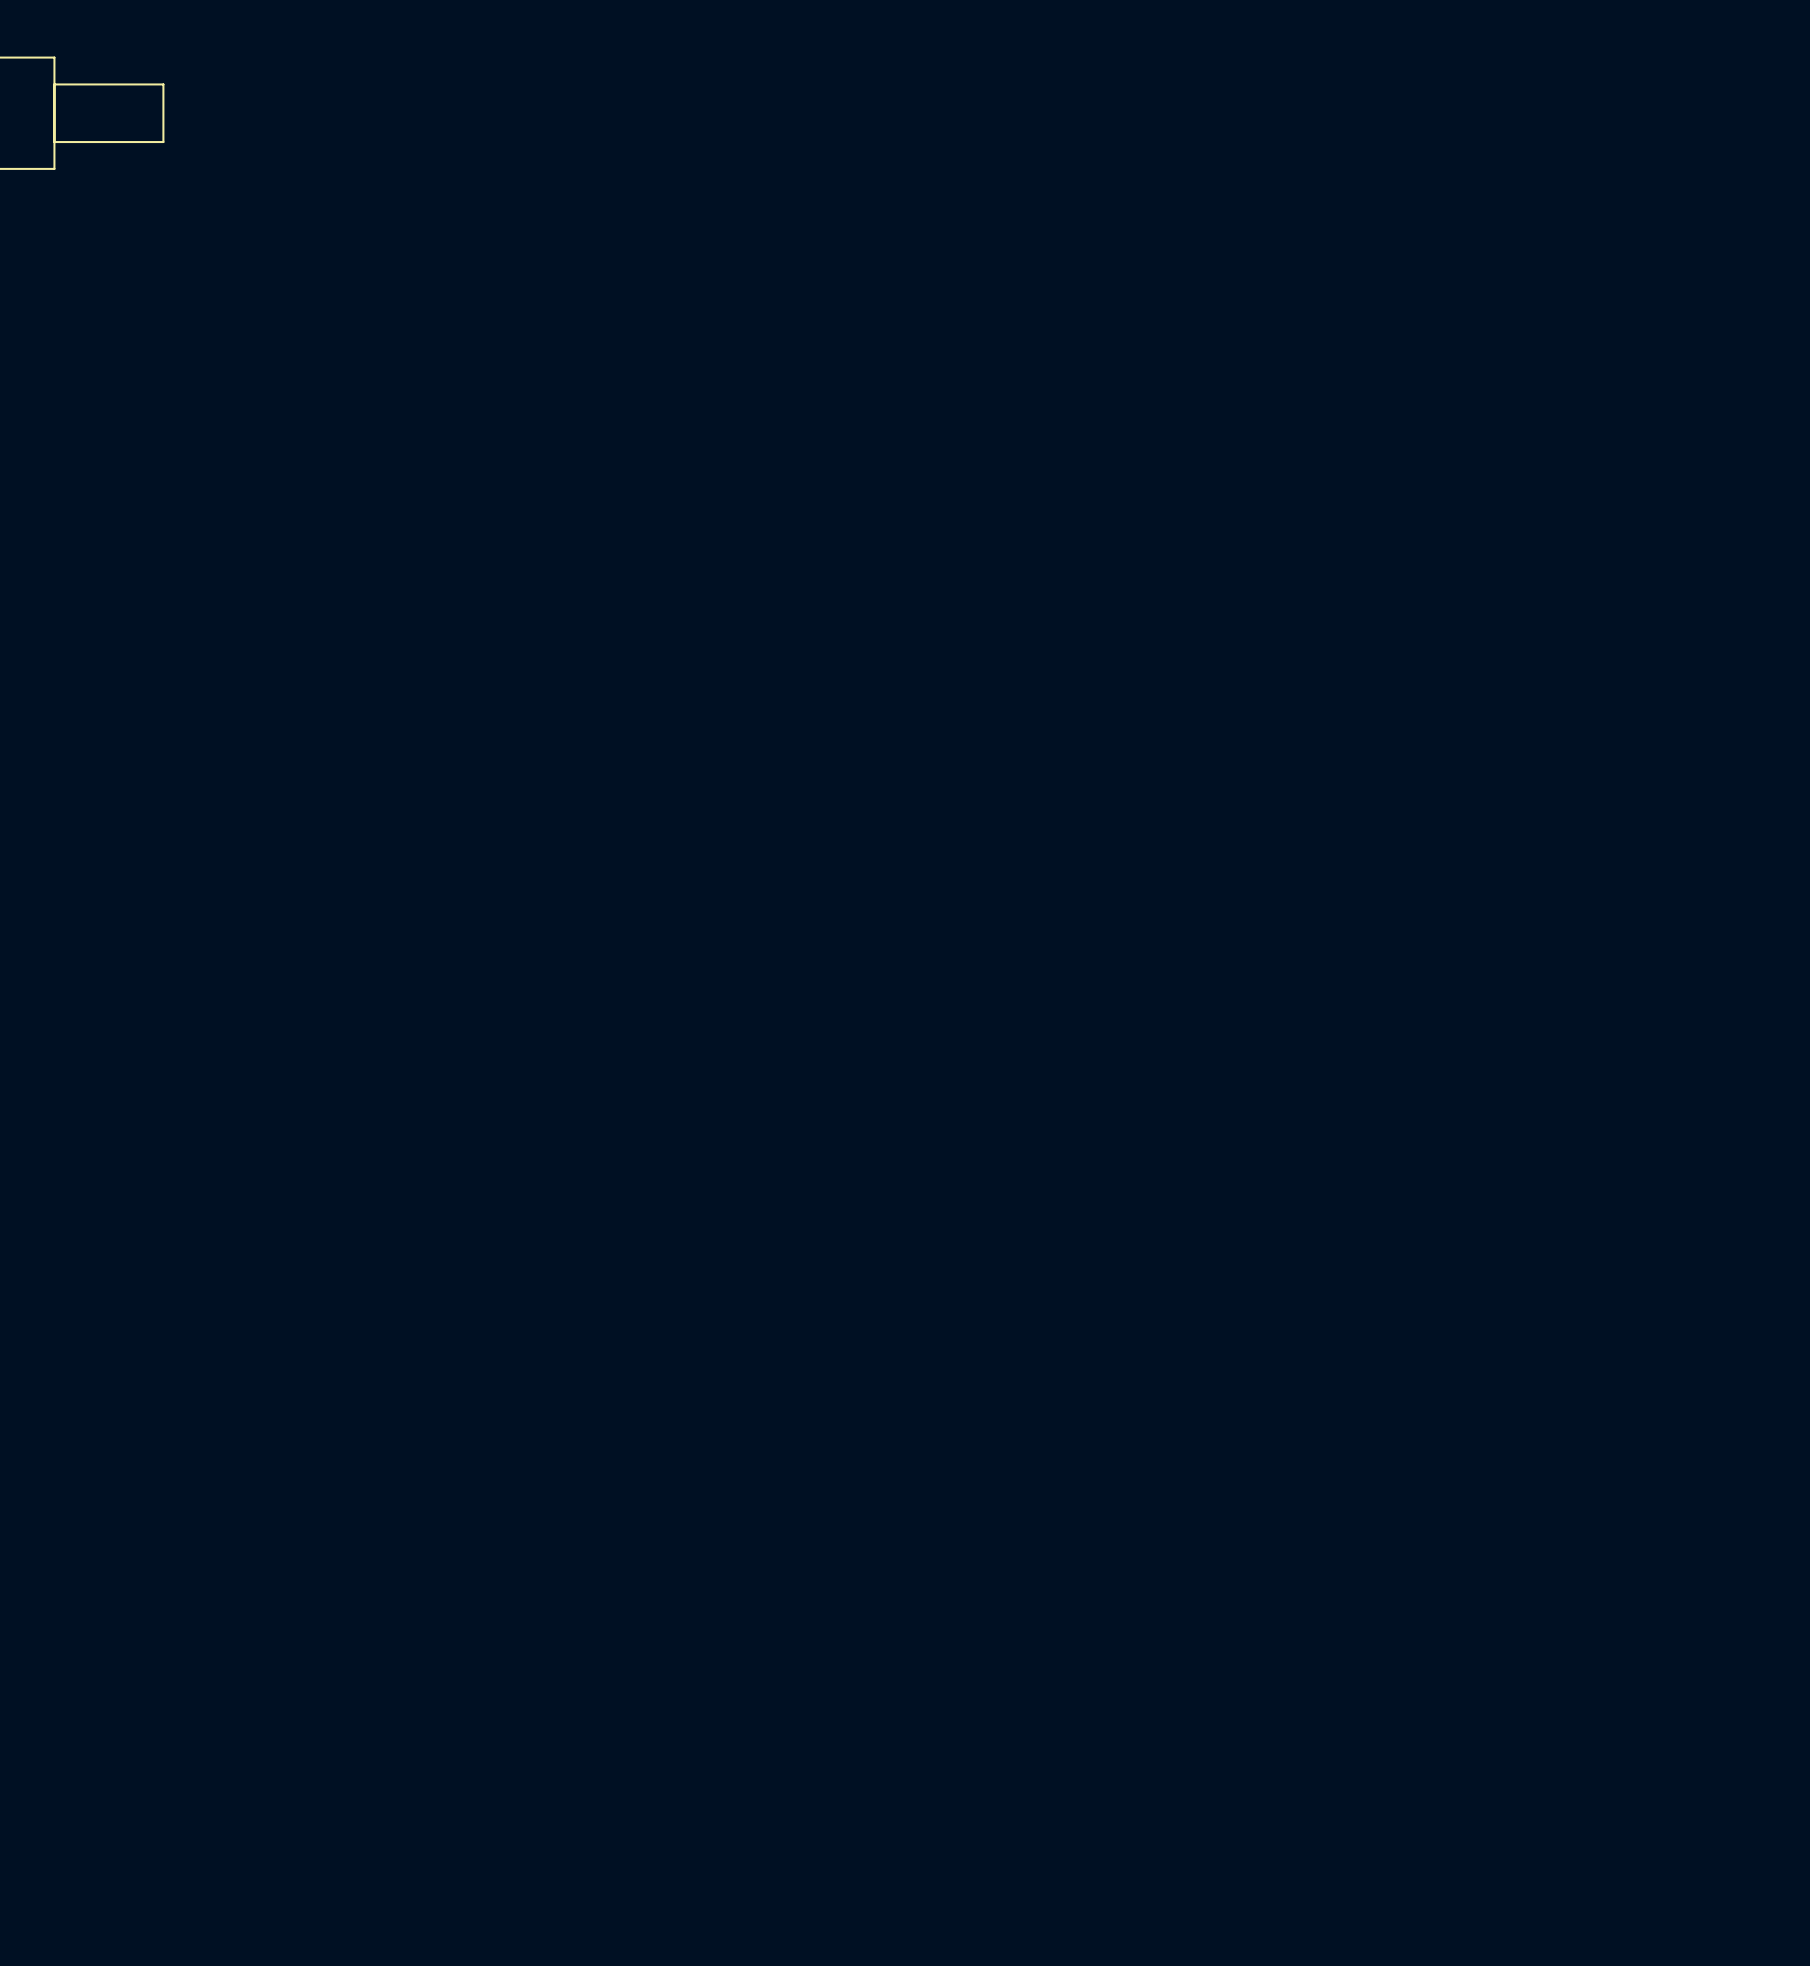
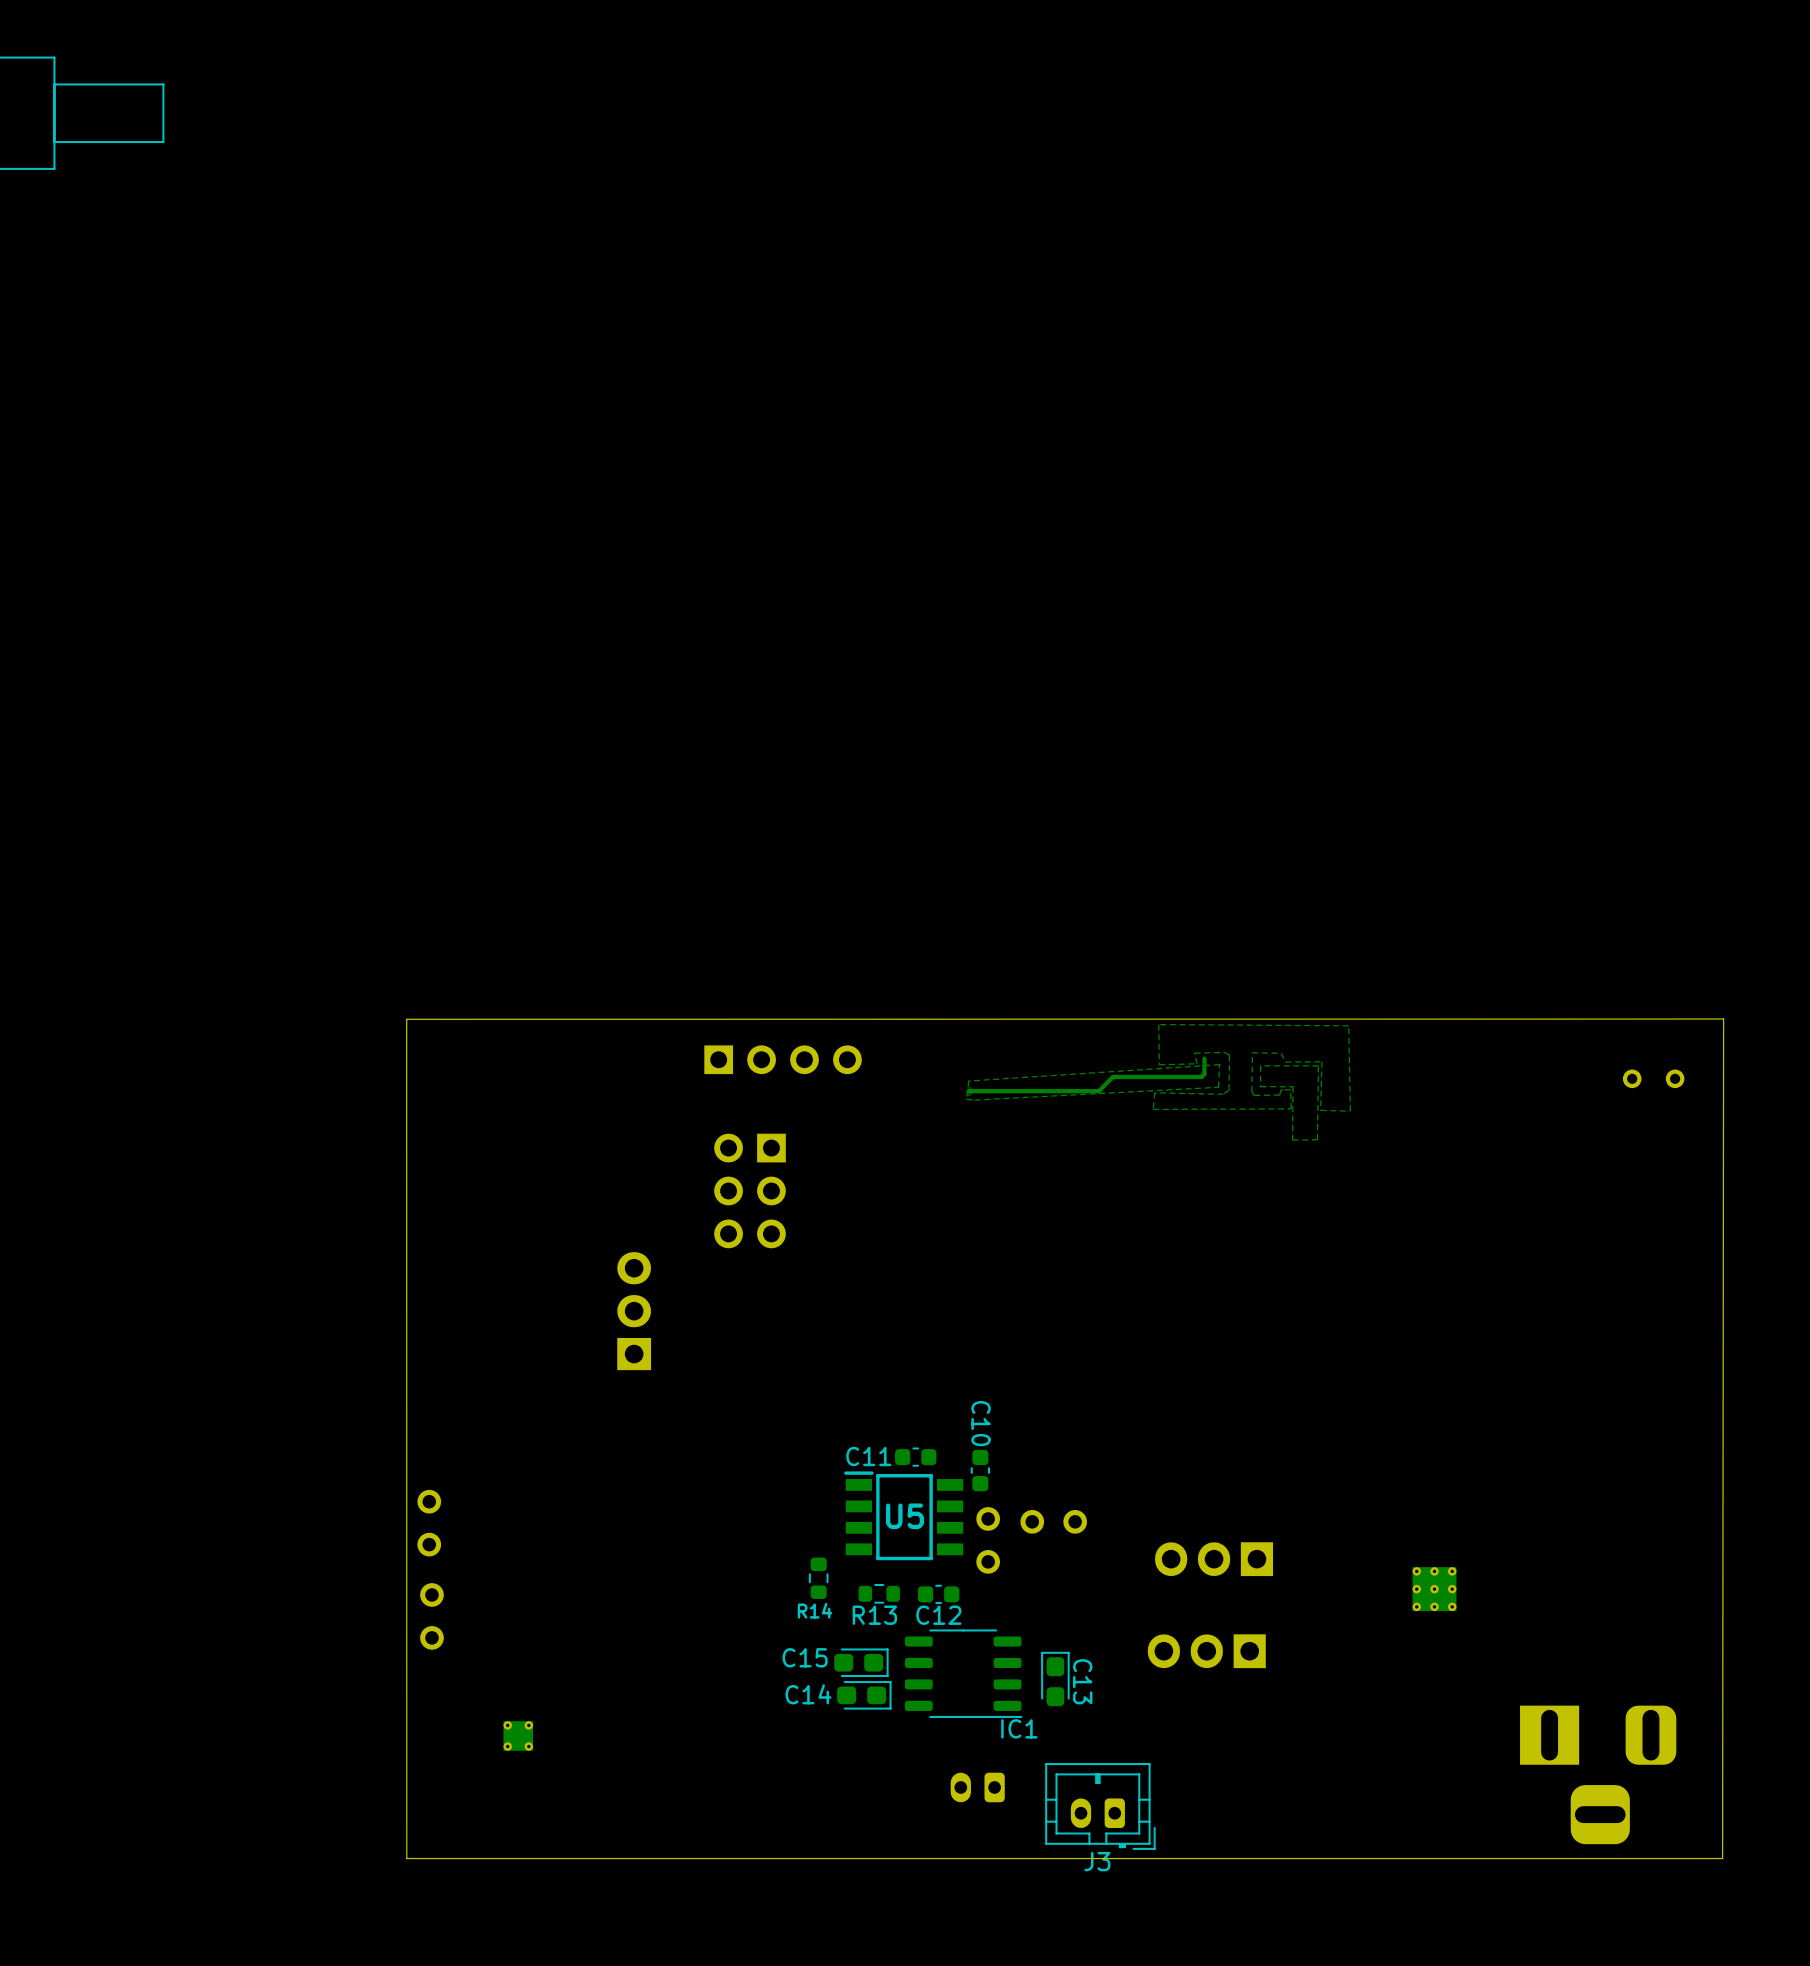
board edge: none -> (1723, 1019) (406, 1019) (406, 1858) (1722, 1858) (1723, 1019)
zone outline: none -> (1158, 1024) (1348, 1025) (1350, 1111) (1320, 1110) (1322, 1061) (1285, 1062) (1281, 1053) (1252, 1052) (1251, 1091) (1254, 1095) (1279, 1095) (1281, 1089) (1290, 1089) (1291, 1108) (1153, 1109) (1154, 1092) (1223, 1094) (1229, 1090) (1229, 1055) (1225, 1052) (1194, 1053) (1196, 1063) (1159, 1064) (1158, 1024)
track: none -> (1204, 1058) (1204, 1074) (1201, 1076) (1113, 1076) (1098, 1091) (968, 1091)
part: none -> (783, 1059)
zone outline: none -> (1219, 1064) (968, 1081) (966, 1099) (1218, 1087) (1219, 1064)
zone outline: none -> (1260, 1065) (1318, 1065) (1317, 1139) (1292, 1140) (1292, 1086) (1260, 1086) (1260, 1065)
part: none -> (1653, 1078)
part: none -> (750, 1190)
part: none -> (634, 1311)
C11: none -> (915, 1457)
C10: none -> (980, 1470)
U5: none -> (903, 1515)
part: none -> (1053, 1521)
part: none -> (429, 1523)
part: none -> (988, 1540)
part: none -> (1214, 1559)
R14: none -> (818, 1578)
part: none -> (1434, 1589)
R13: none -> (879, 1593)
C12: none -> (938, 1594)
part: none -> (431, 1616)
part: none -> (1206, 1651)
C15: none -> (861, 1662)
IC1: none -> (963, 1673)
C13: none -> (1055, 1678)
C14: none -> (864, 1695)
part: none -> (518, 1735)
part: none -> (1598, 1774)
part: none -> (977, 1787)
J3: none -> (1100, 1806)

